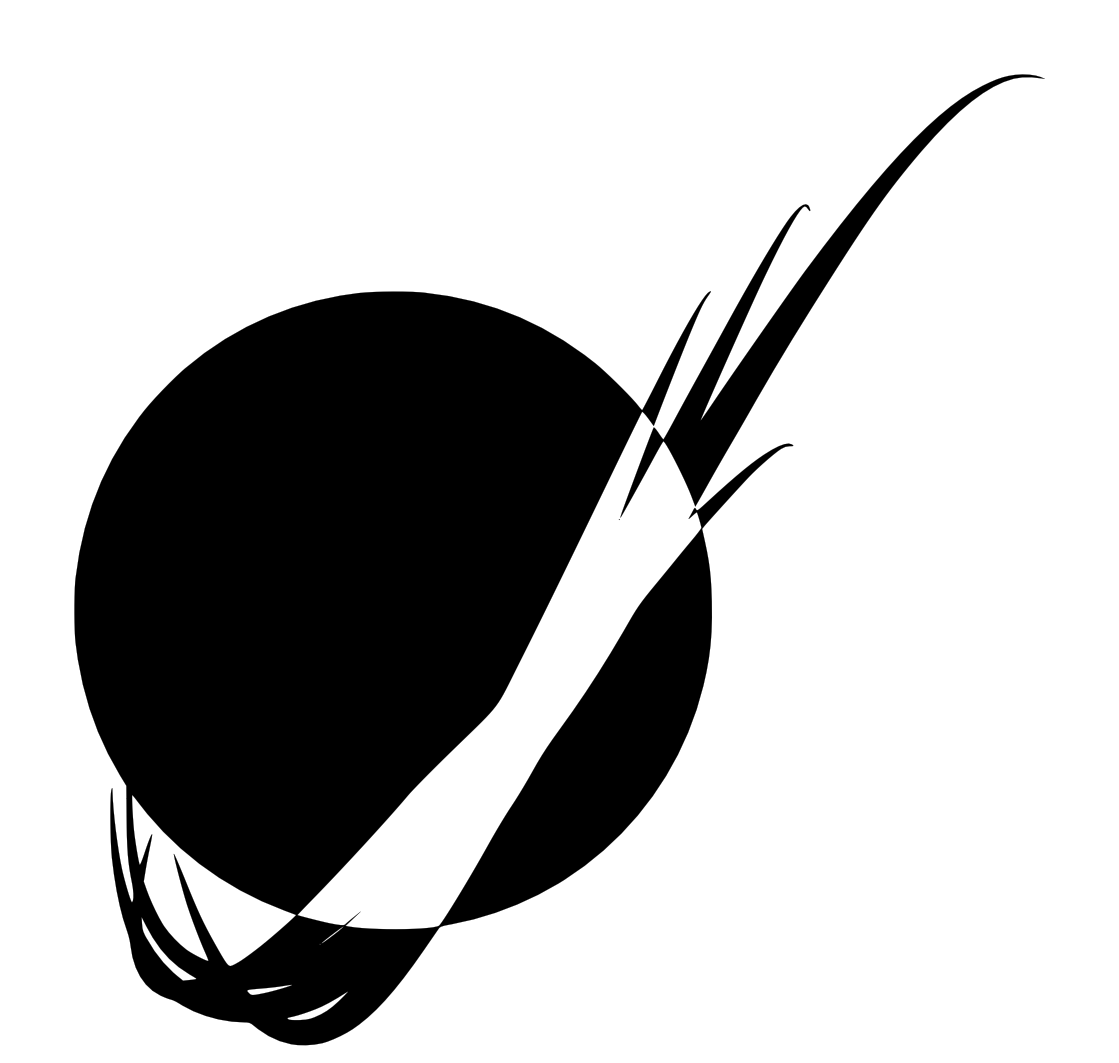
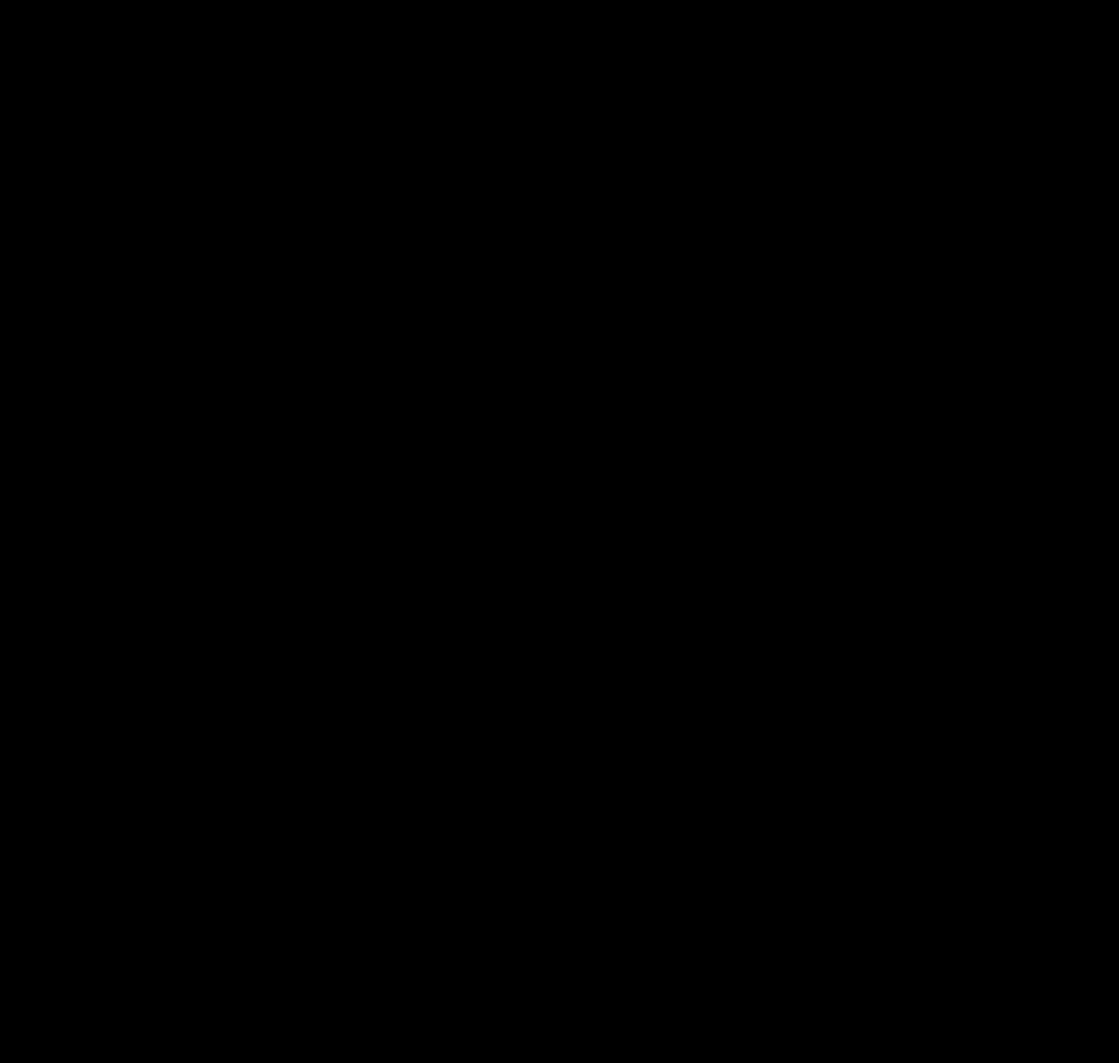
drawing: [74, 74, 1045, 1046] -> none

